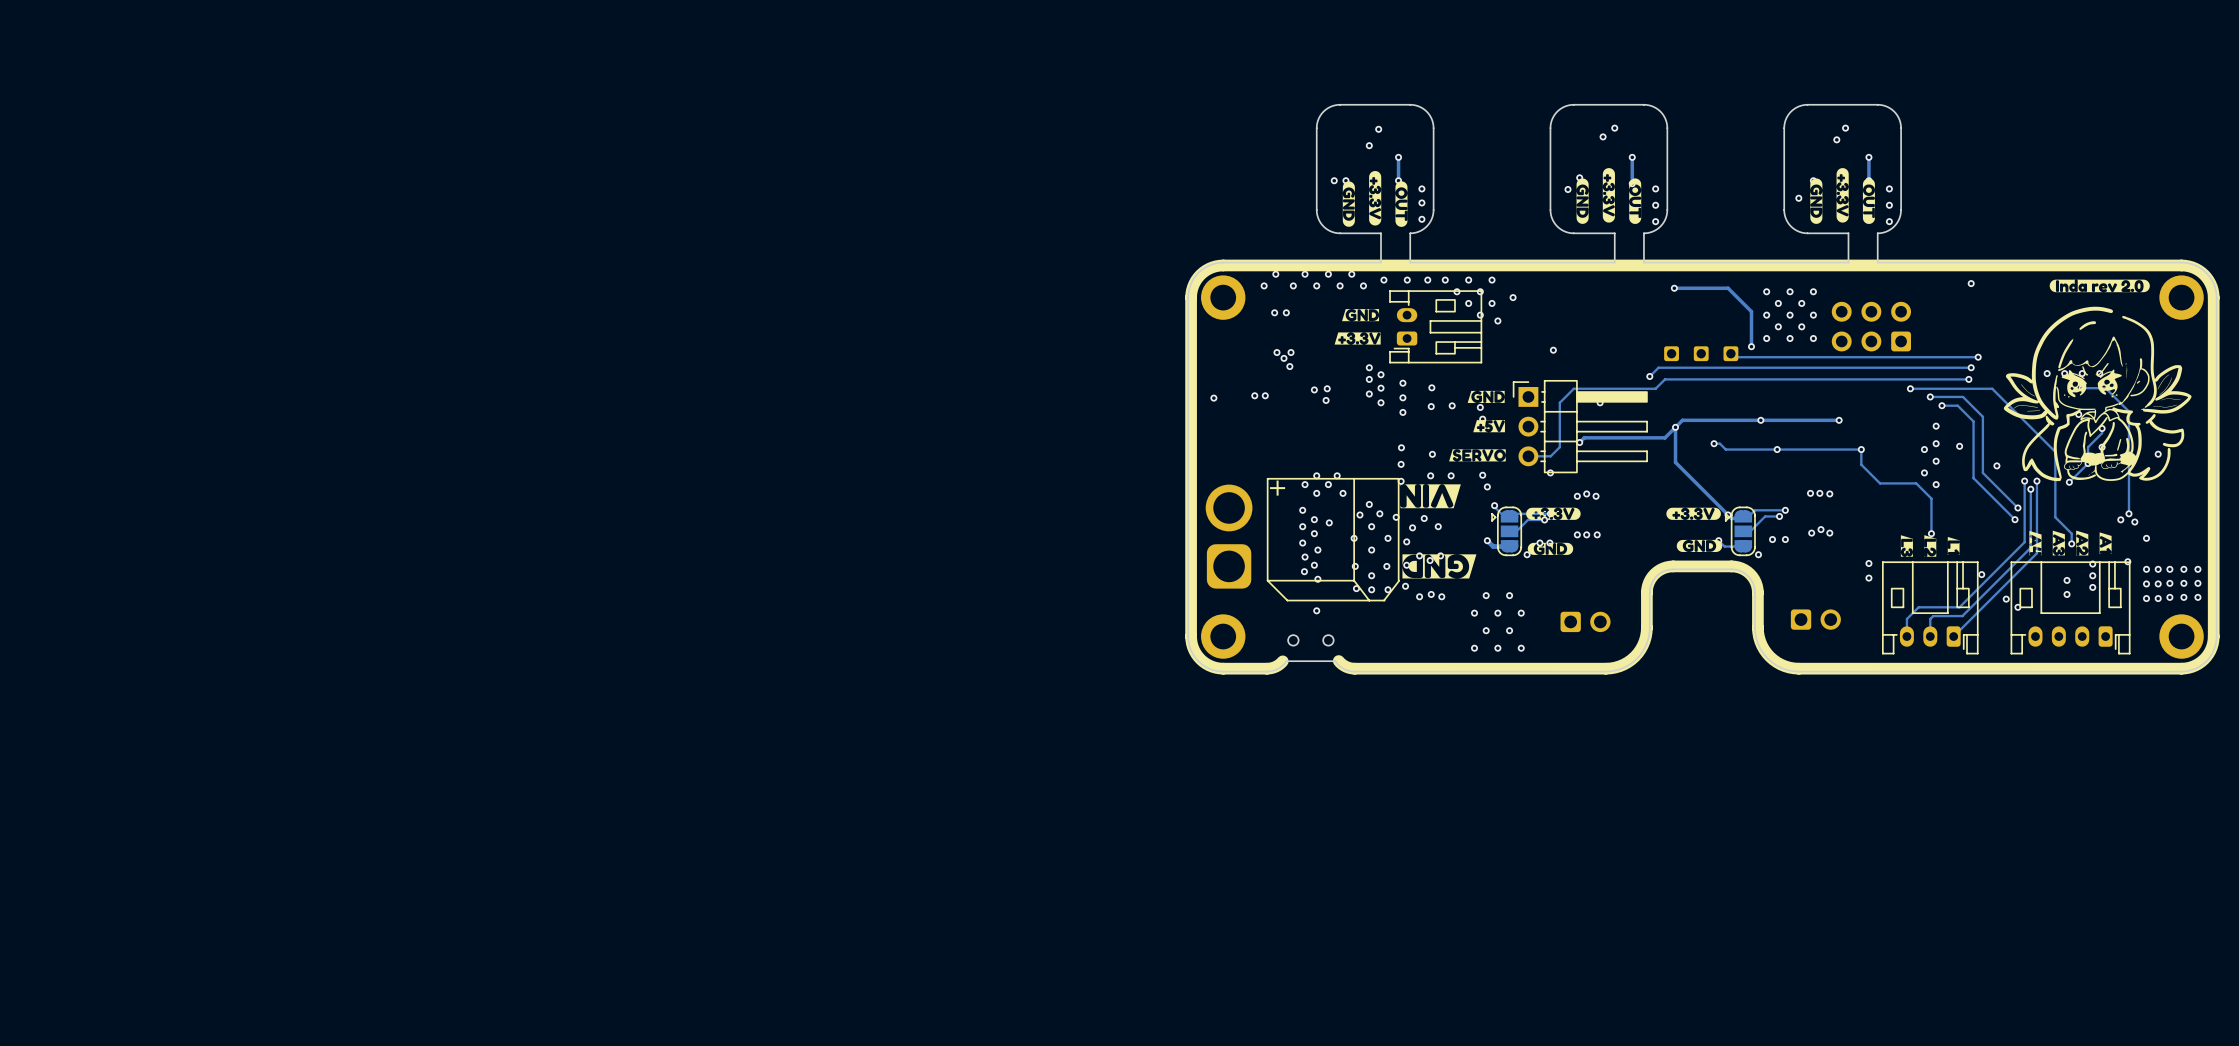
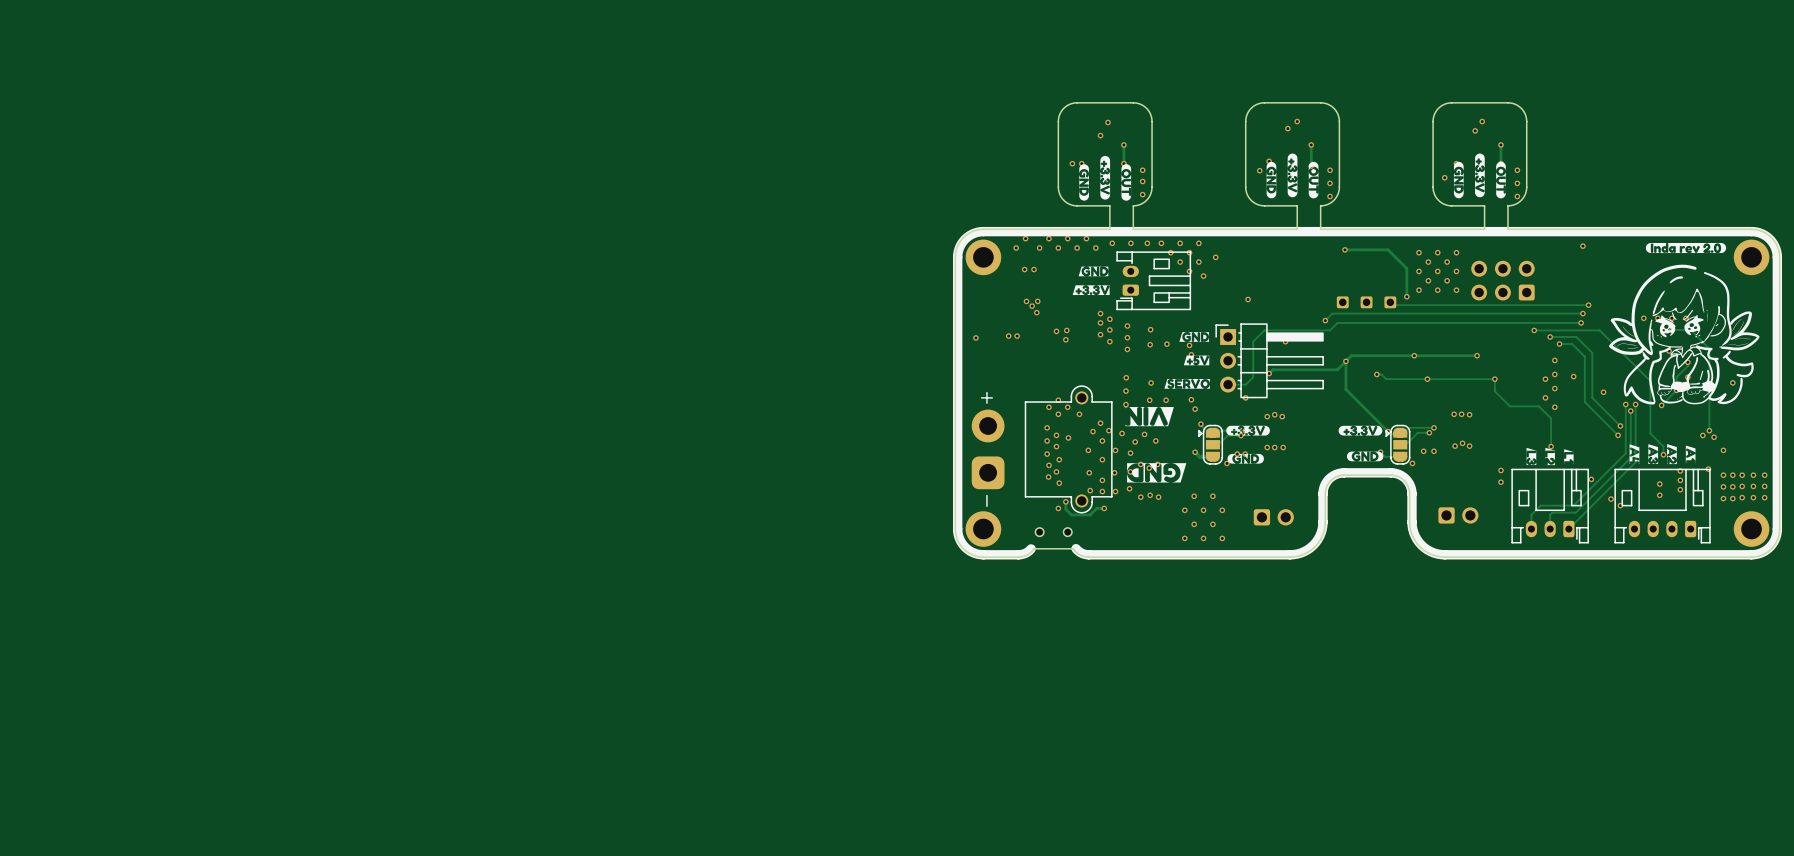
via: (1337, 475) -> none
part footprint: [1205, 478, 1400, 602] -> [971, 385, 1113, 514]
track: none -> (1065, 501) (1065, 509) (1071, 514) (1090, 514) (1096, 508) (1104, 508)
via: none -> (1065, 501)
via: none -> (1104, 508)

